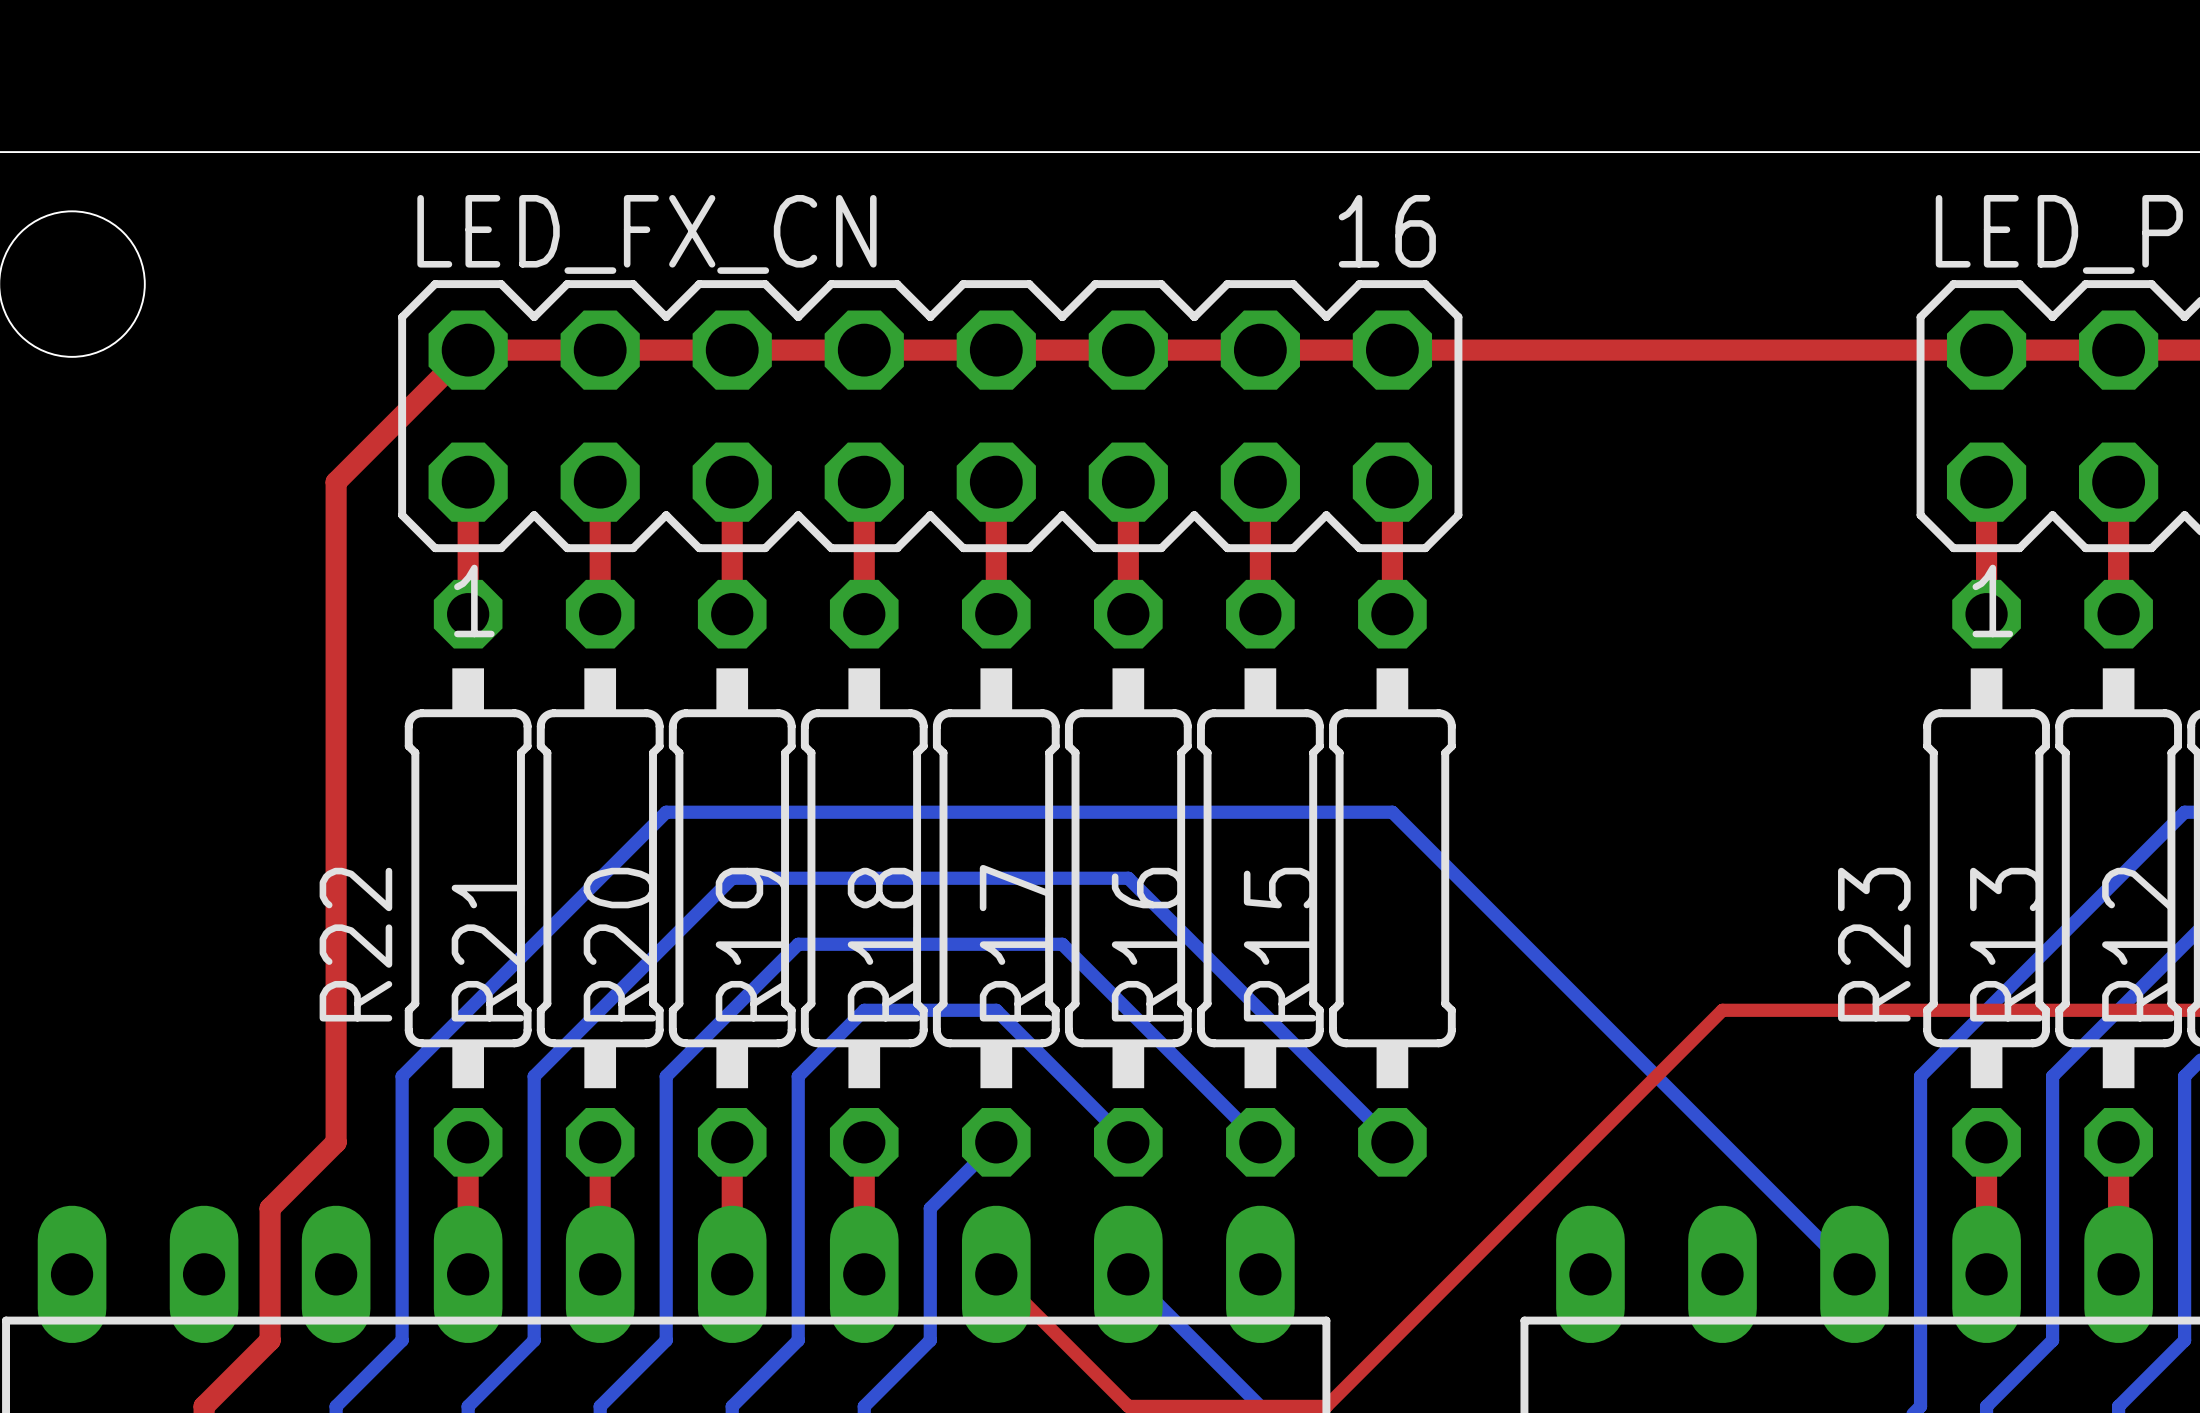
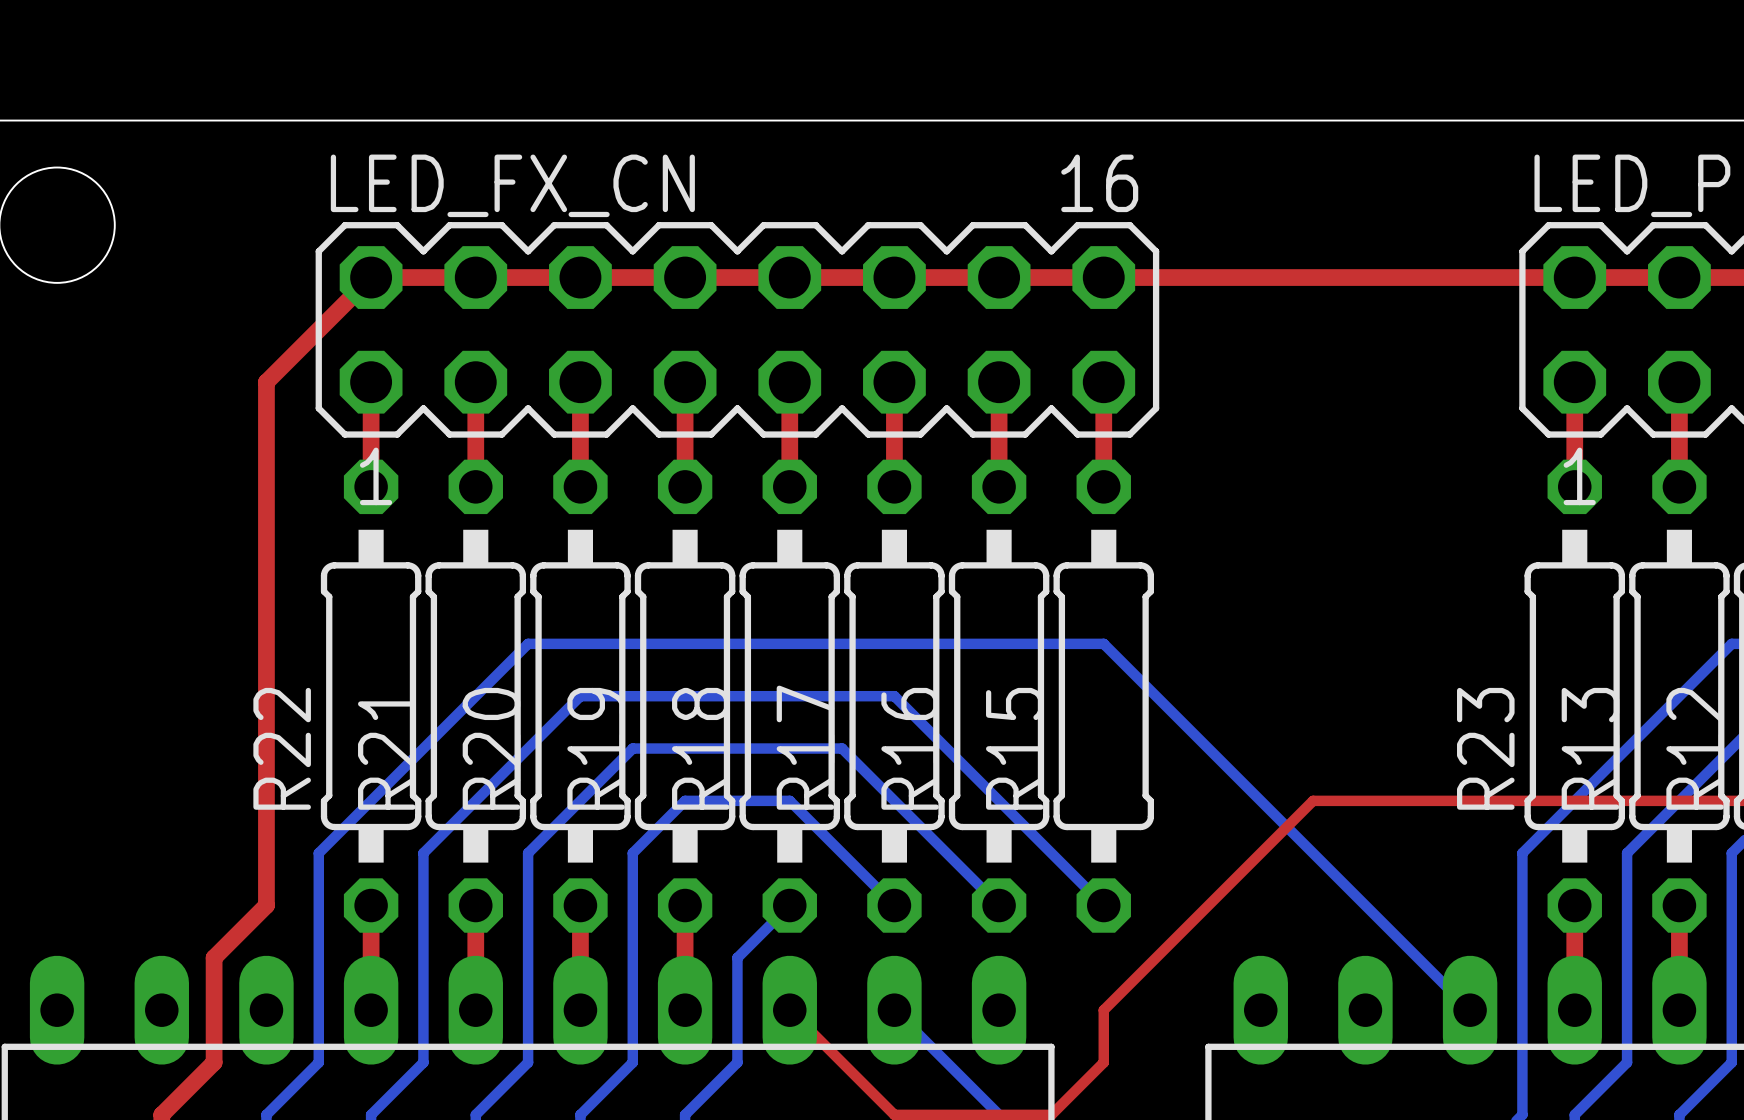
top track: (1722, 1010) (1392, 1340) -> (1365, 800) (1313, 800) (1103, 1010) (1103, 1062)

